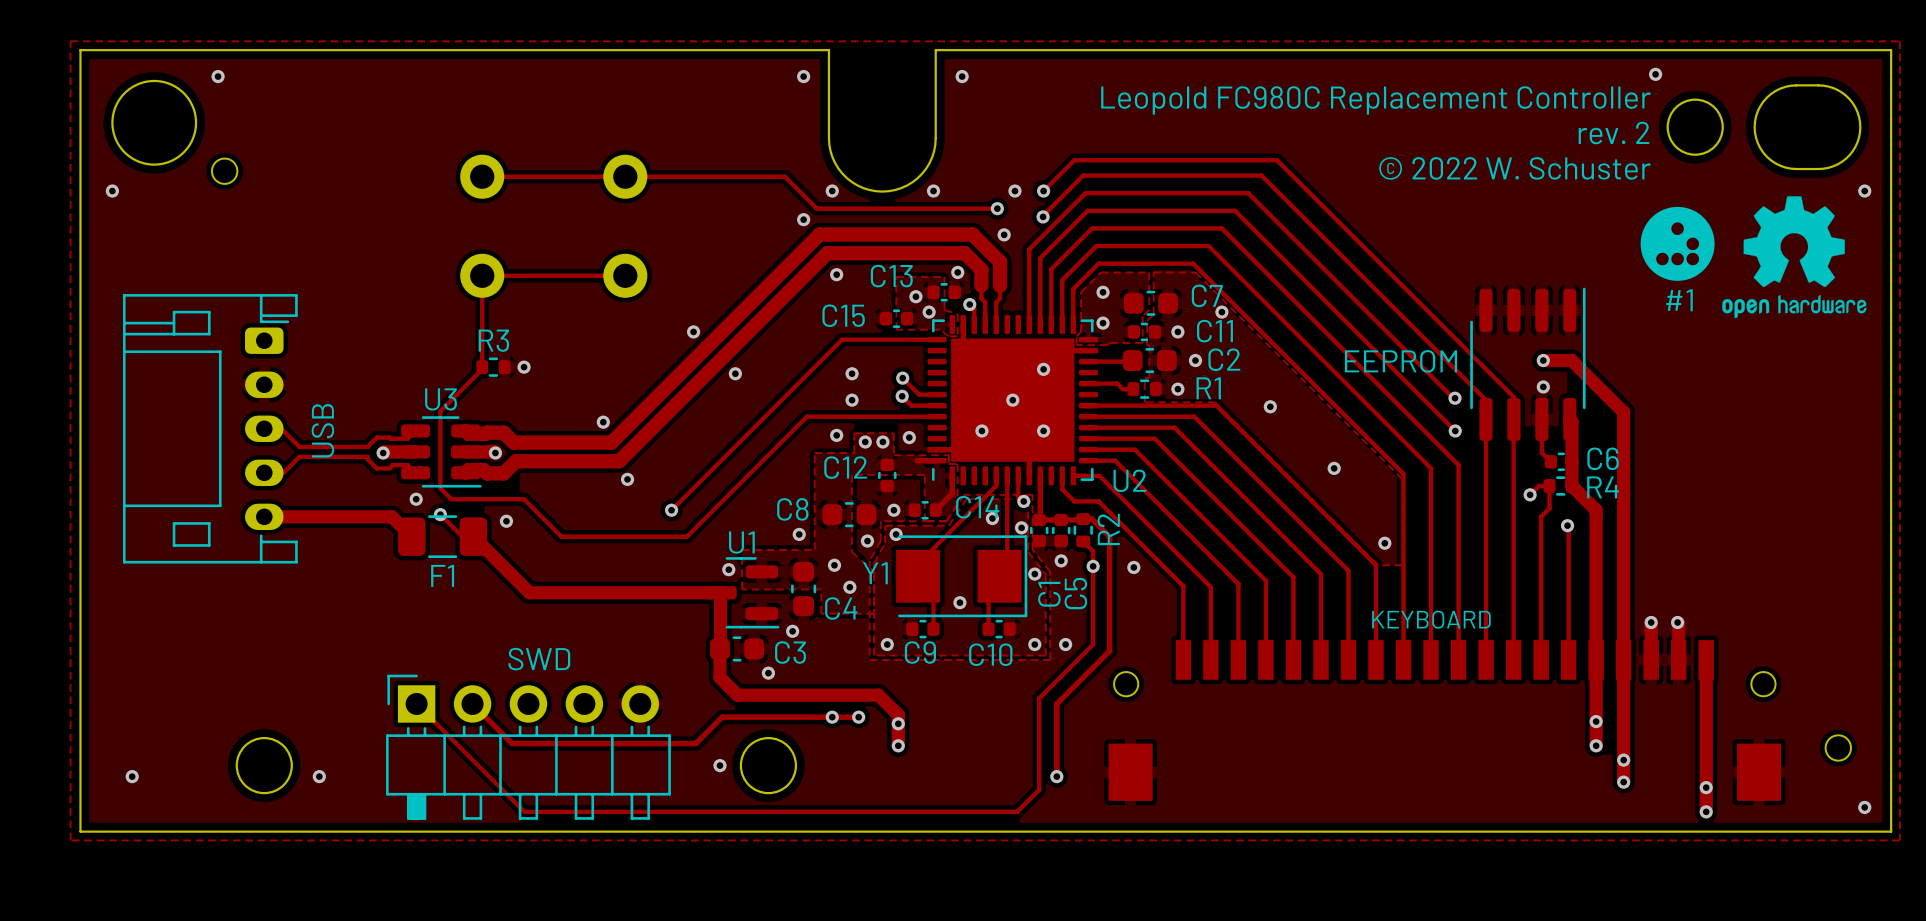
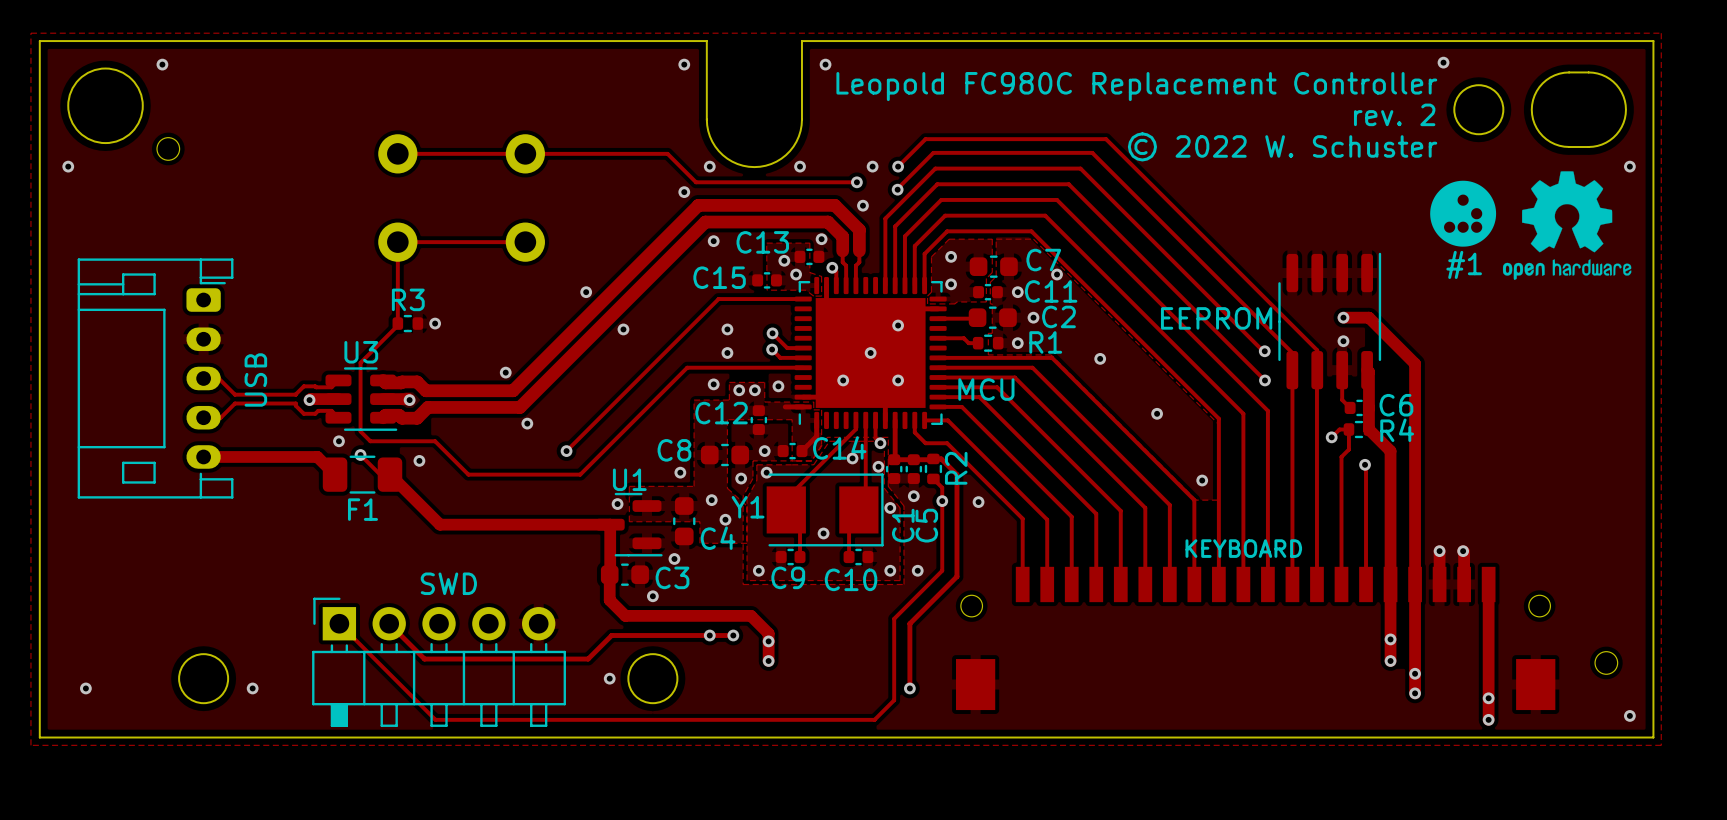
U2 text: none -> MCU (986, 389)
U2 name: U2 (1129, 480) -> none

